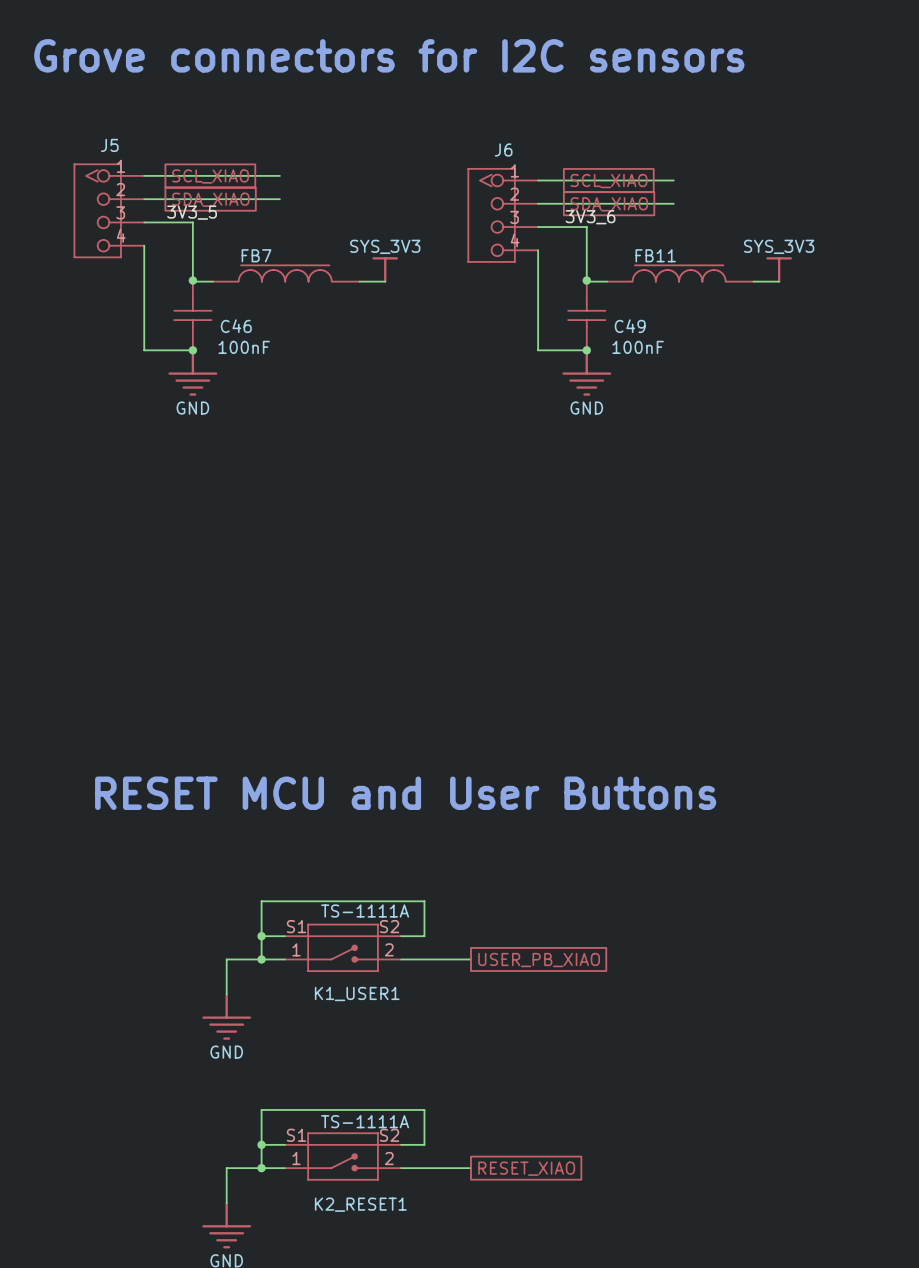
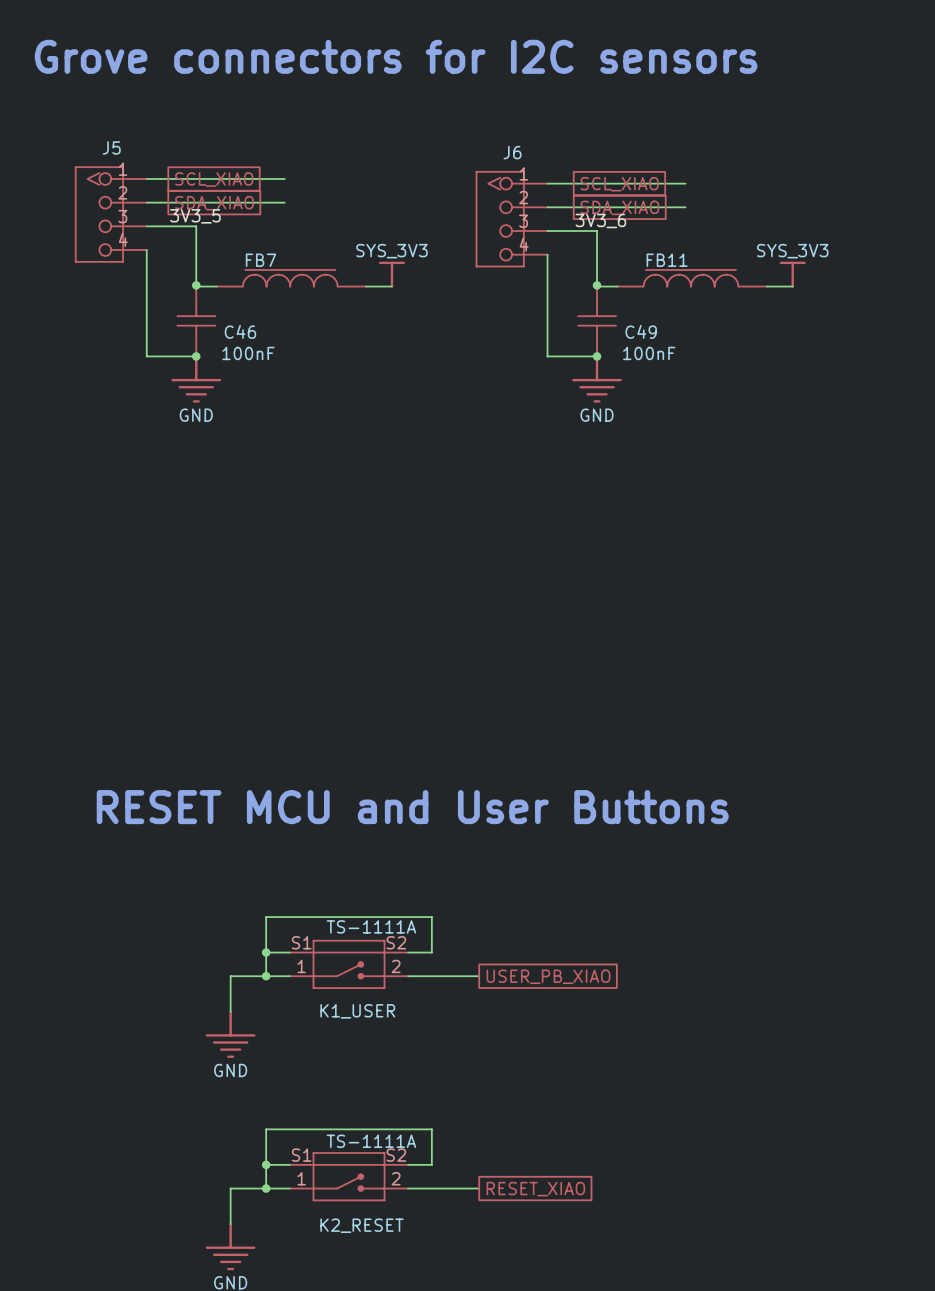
K1_USER1 name: K1_USER1 (357, 994) -> K1_USER (357, 1011)
K2_RESET1 name: K2_RESET1 (360, 1204) -> K2_RESET (362, 1225)

